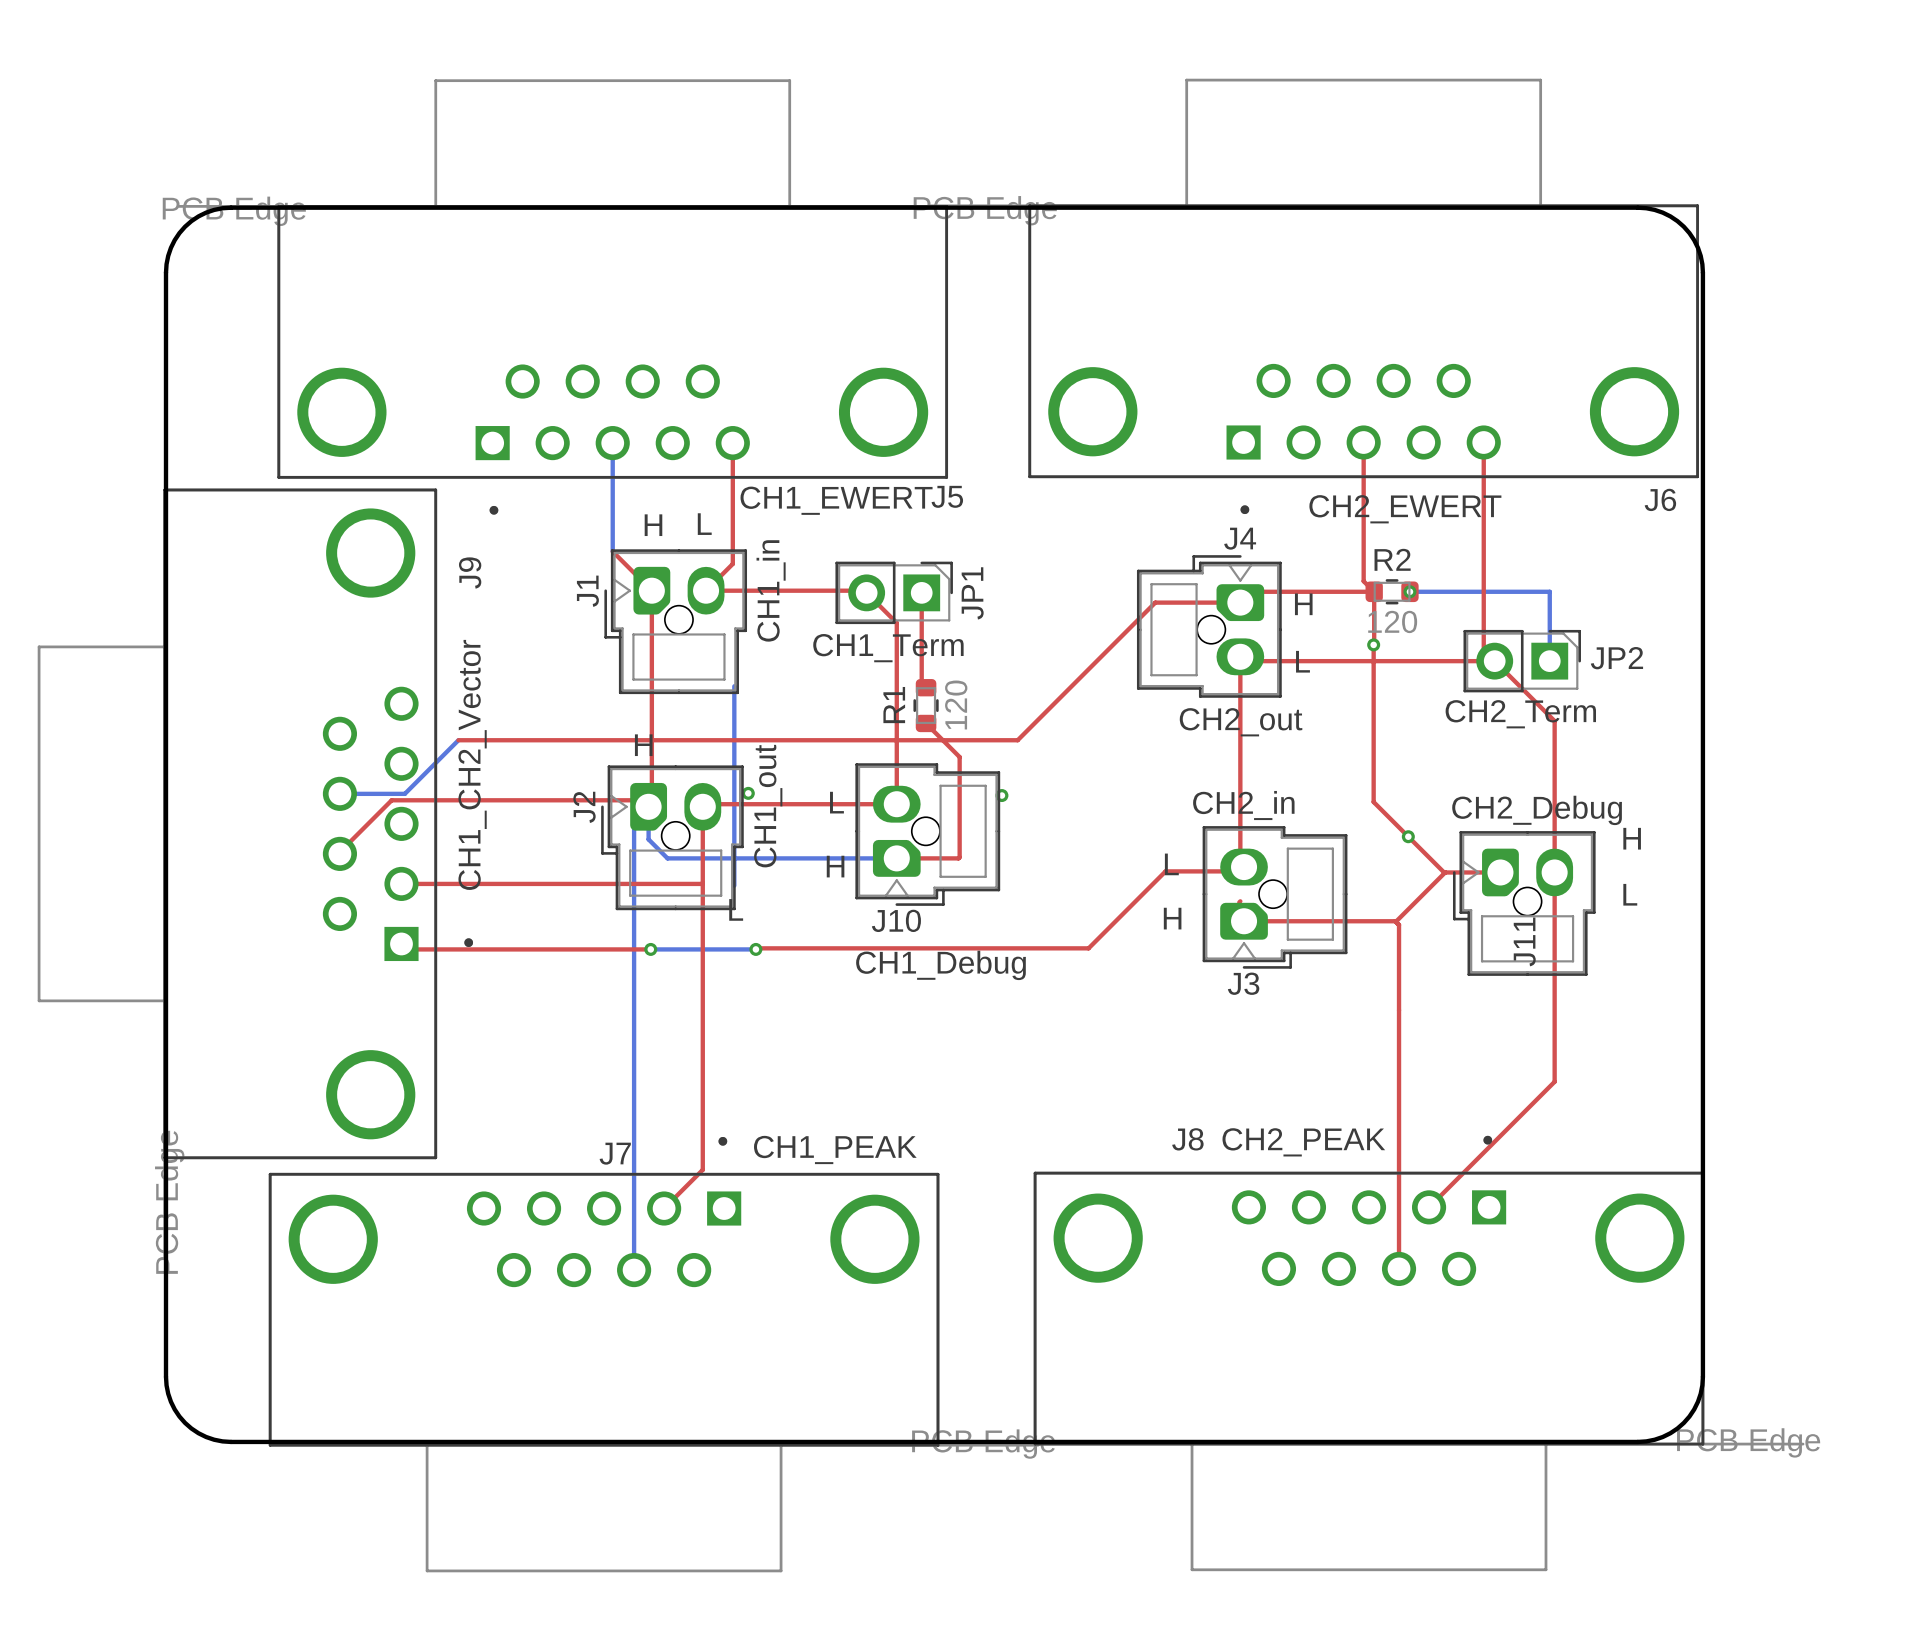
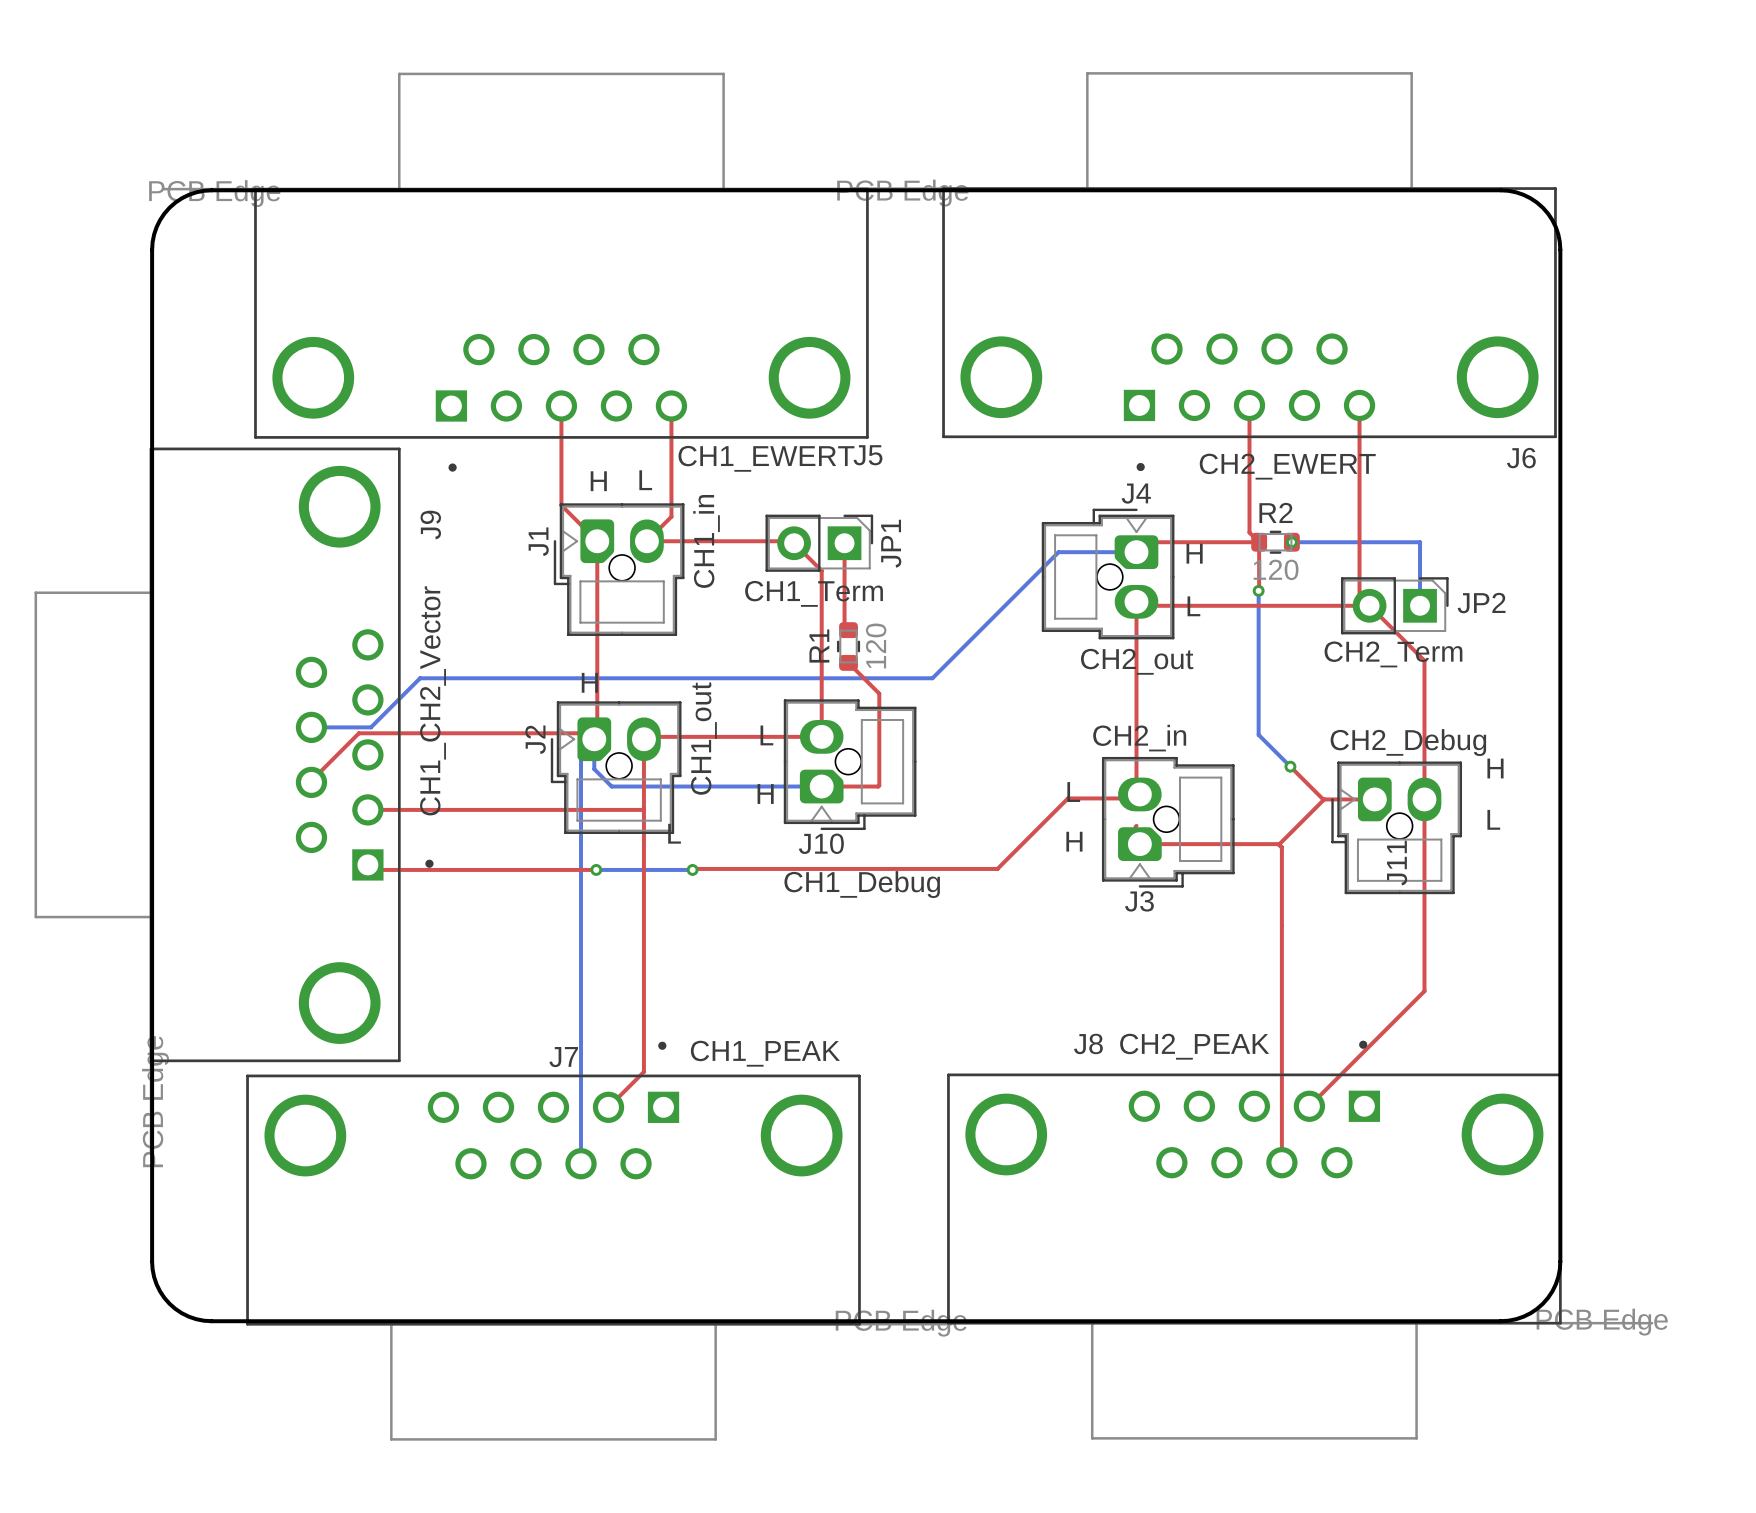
top track: none -> (561, 405) (561, 505)
bottom track: (612, 443) (612, 551) -> none
top track: (1240, 602) (1155, 602) (1017, 740) (458, 740) -> none
bottom track: none -> (1136, 552) (1058, 552) (932, 678) (420, 678)
top track: (1373, 644) (1373, 802) (1408, 836) -> none
bottom track: none -> (1258, 590) (1258, 734) (1290, 766)
bottom track: (734, 686) (734, 885) -> none
via: (748, 793) -> none
via: (1001, 795) -> none

